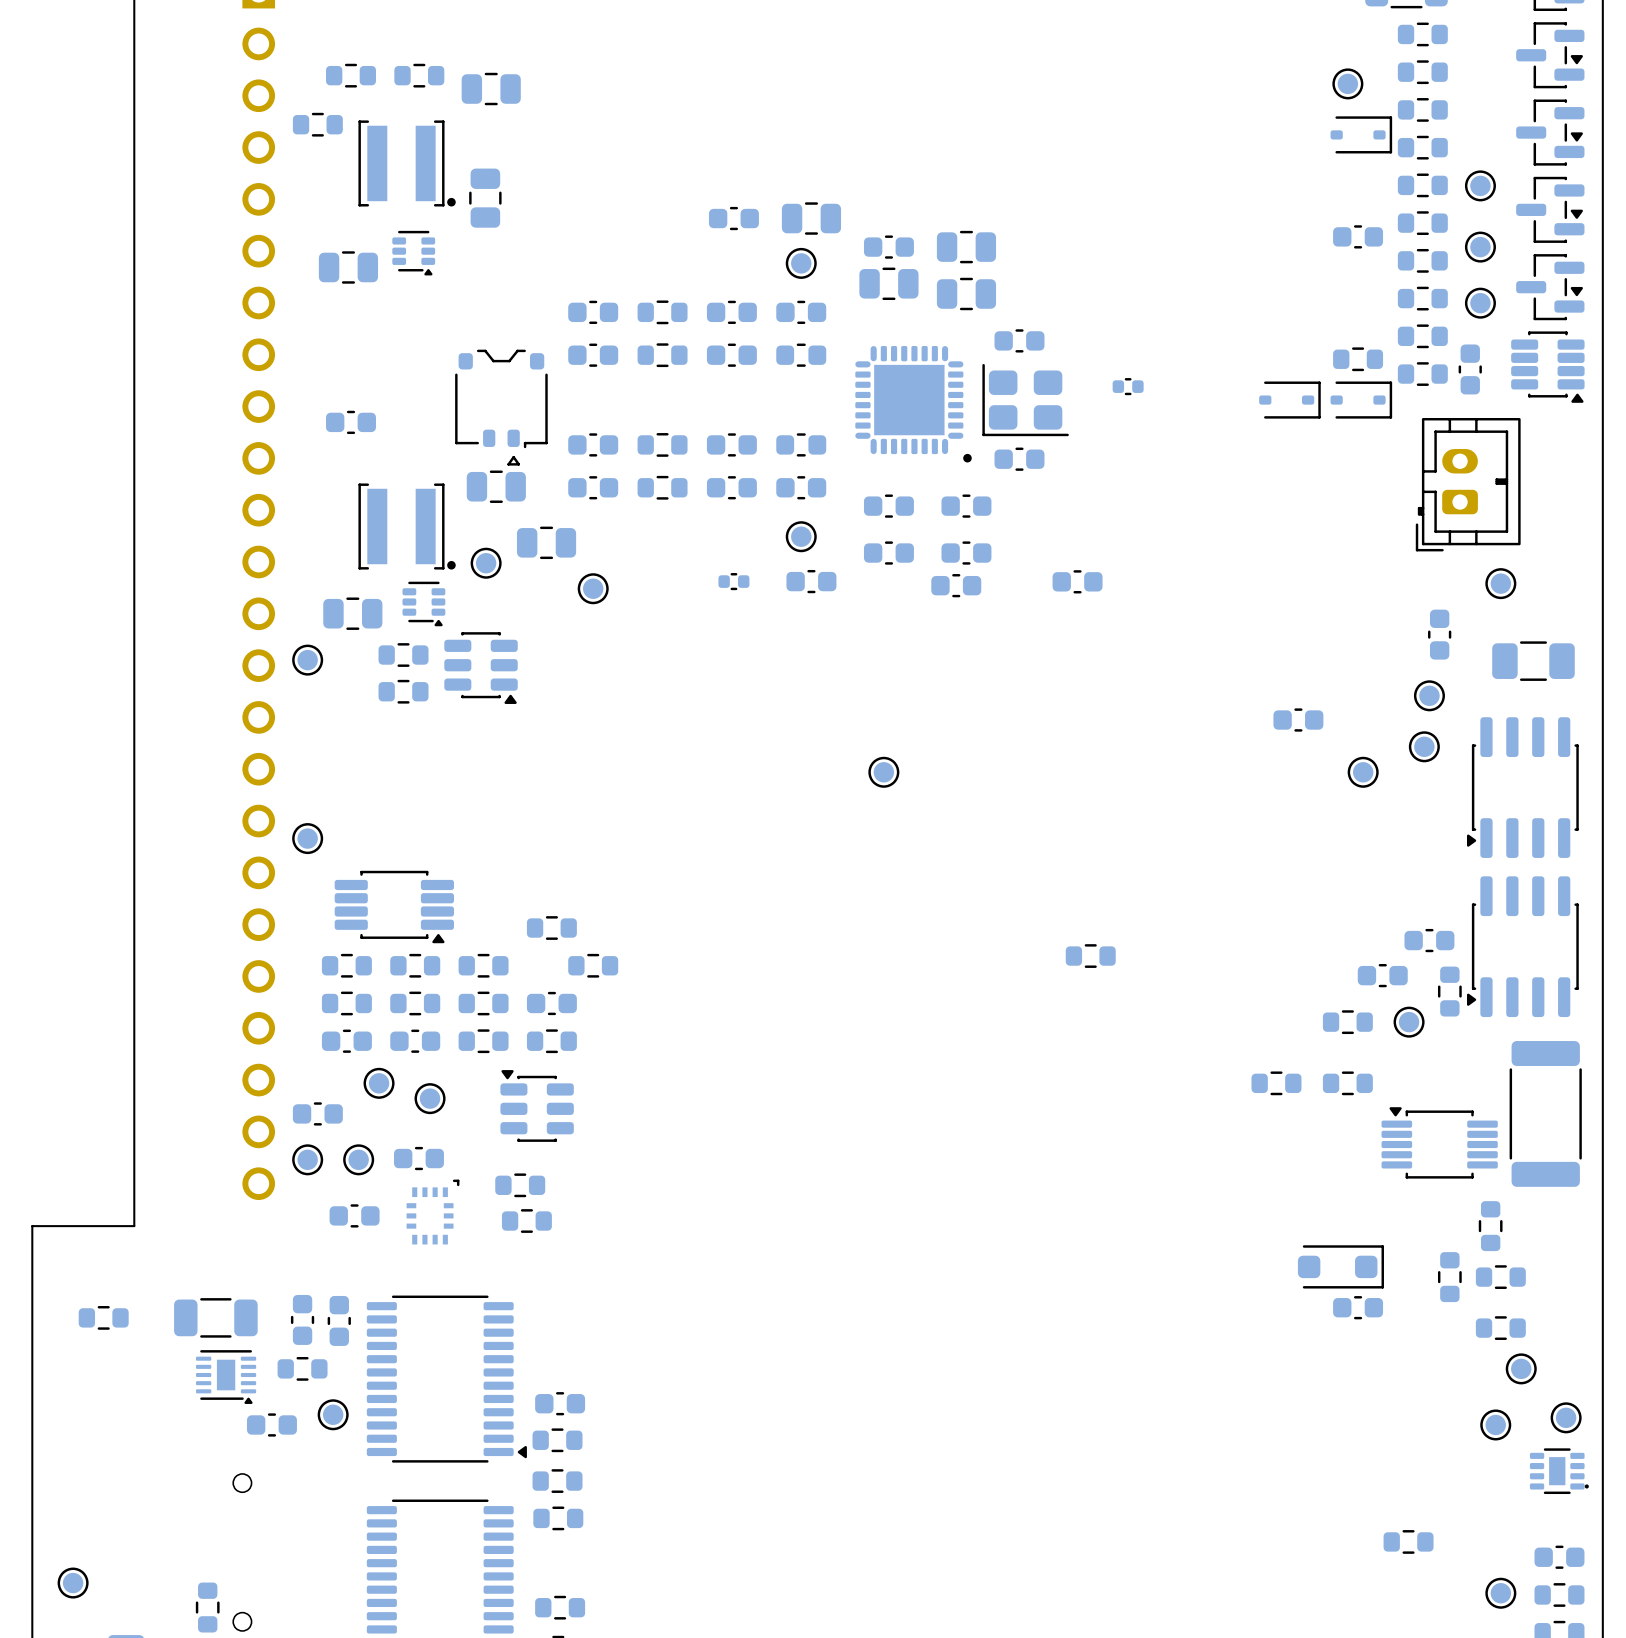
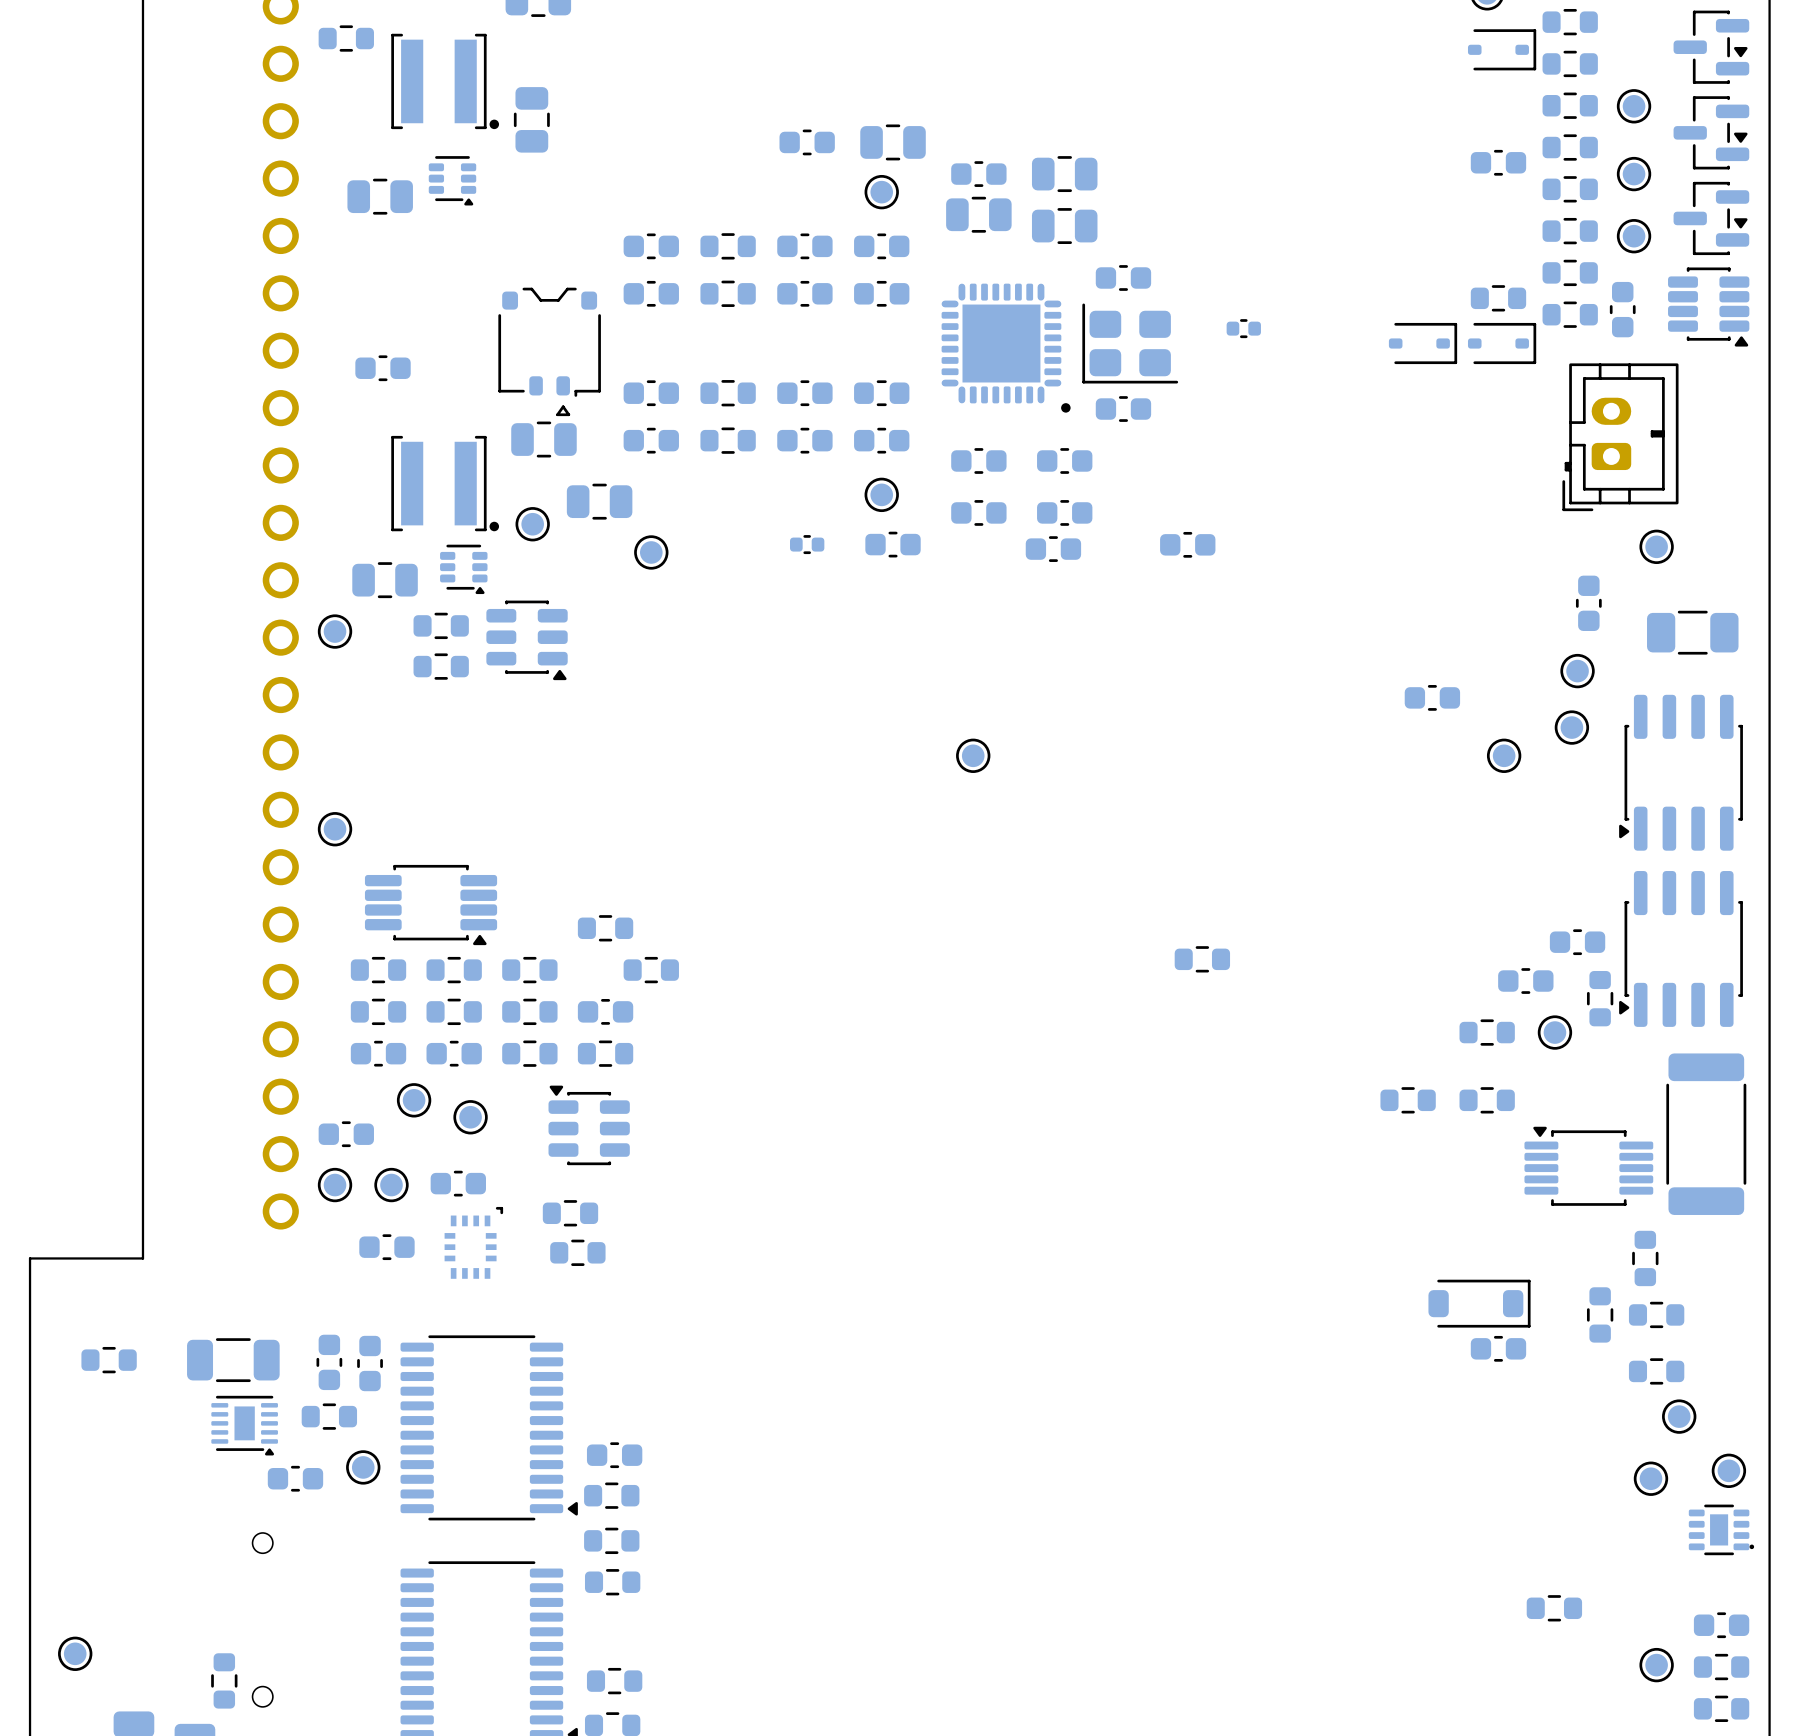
part footprint: [1297, 1245, 1384, 1289] -> [1428, 1279, 1531, 1328]

